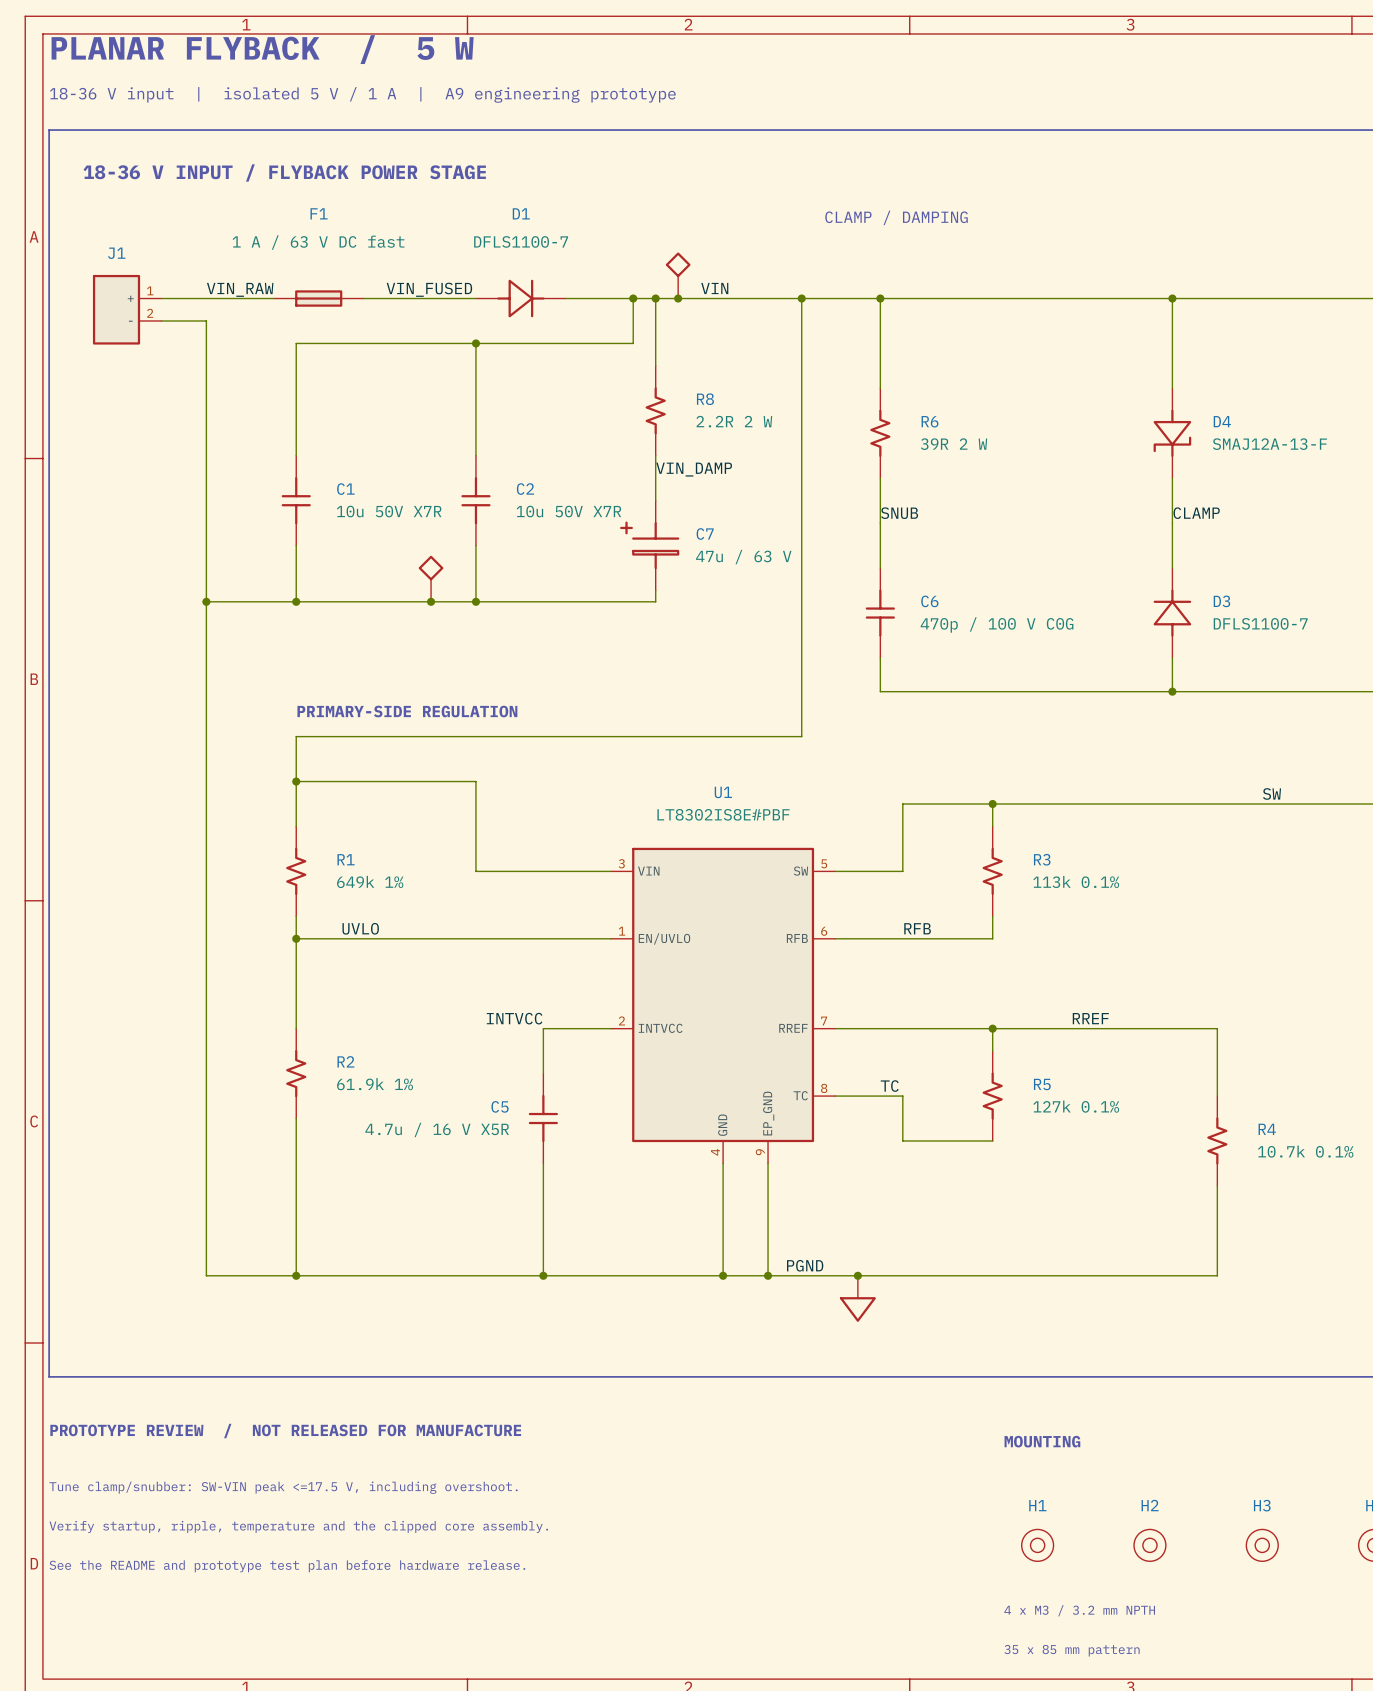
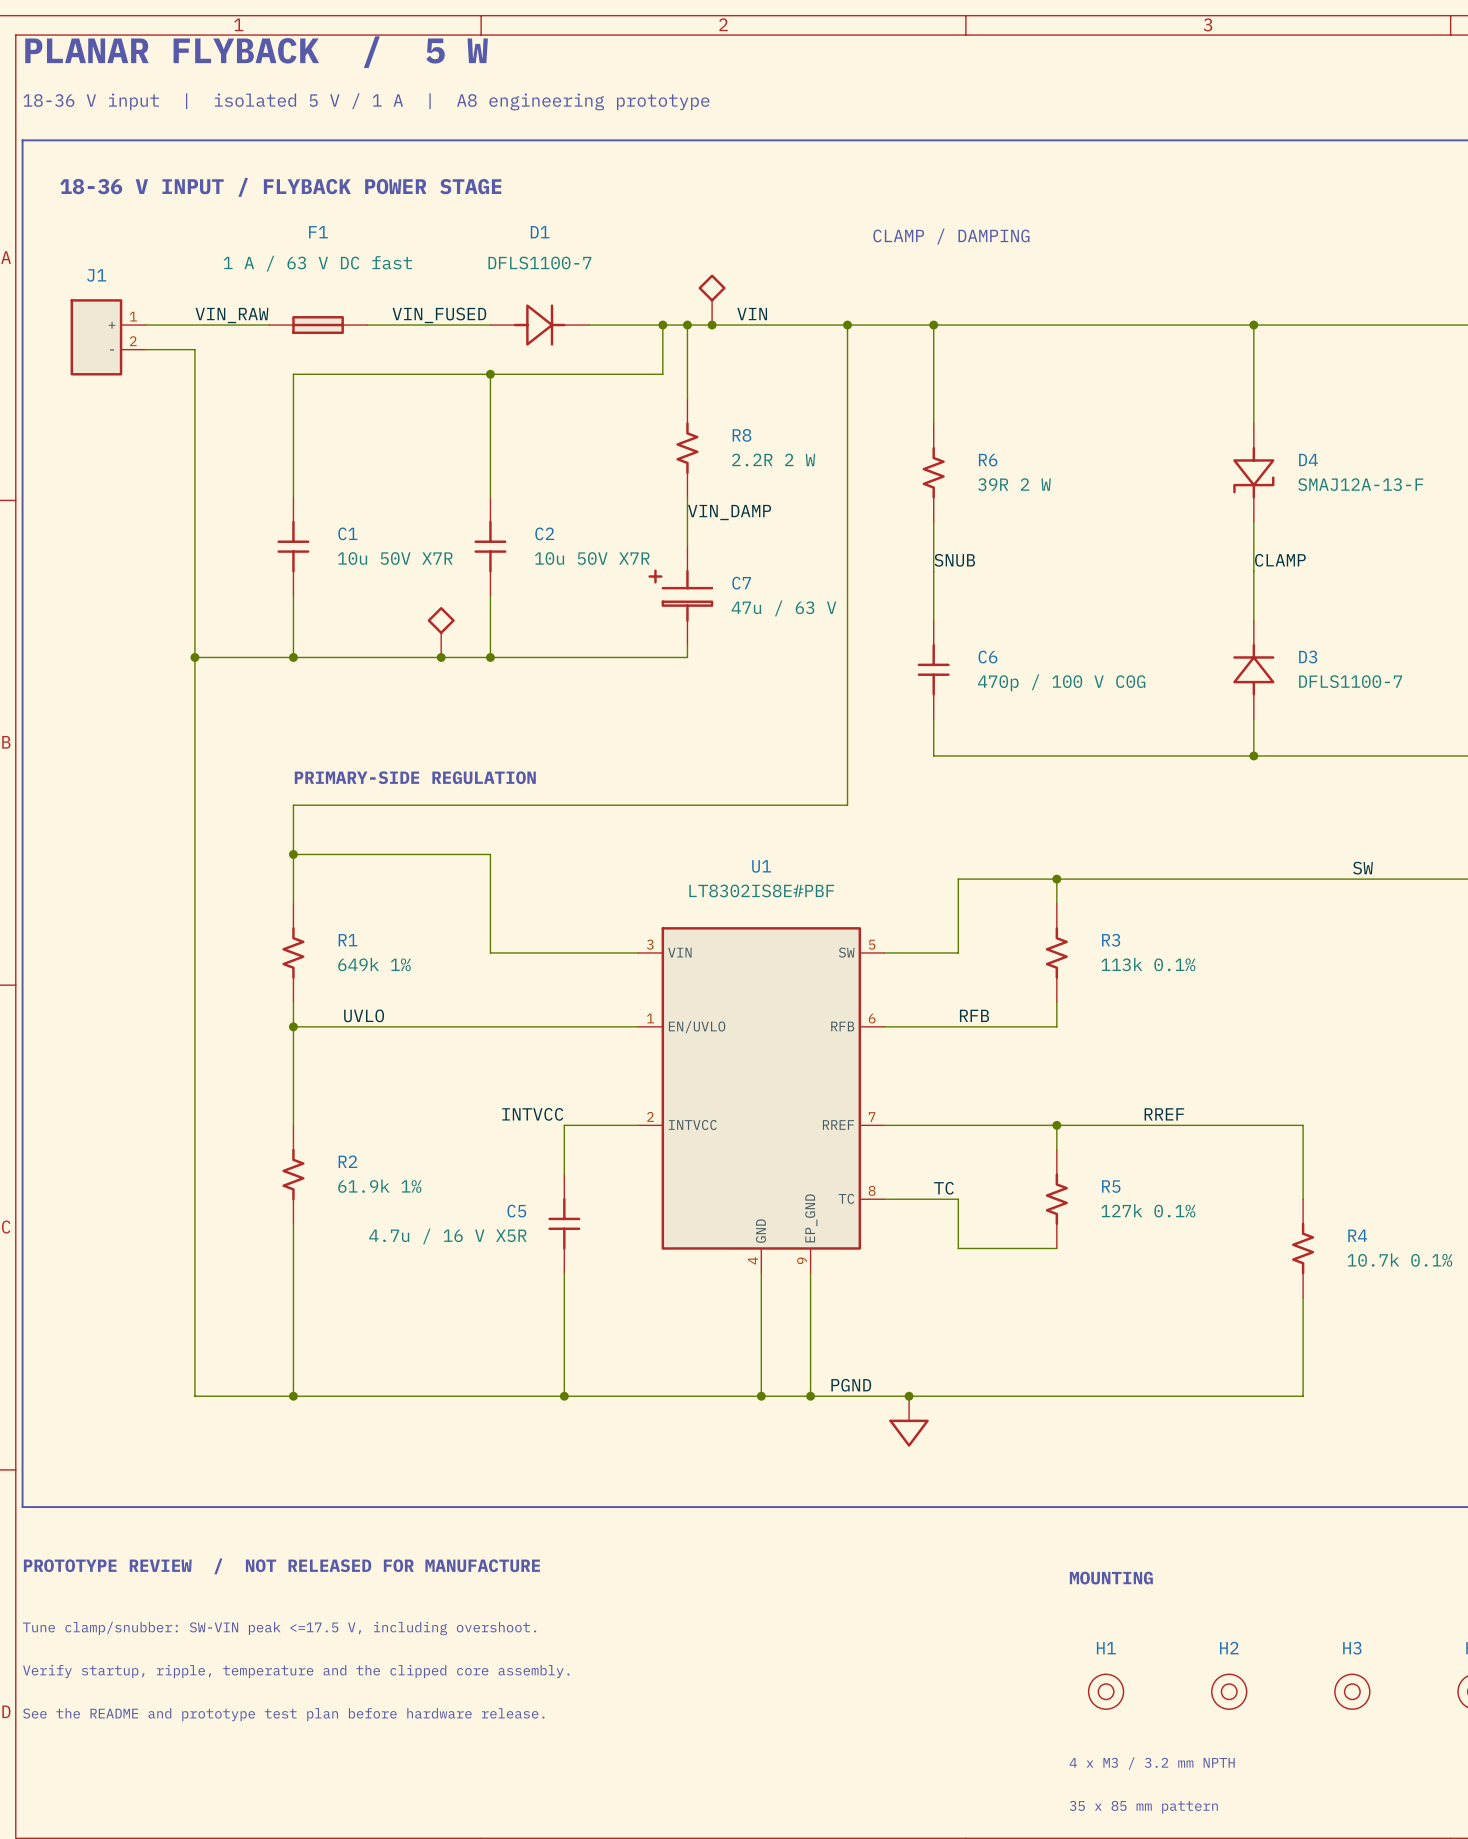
text: 18-36 V input | isolated 5 V / 1 A | A9 engineering prototype (362, 94) -> 18-36 V input | isolated 5 V / 1 A | A8 engineering prototype (366, 101)

